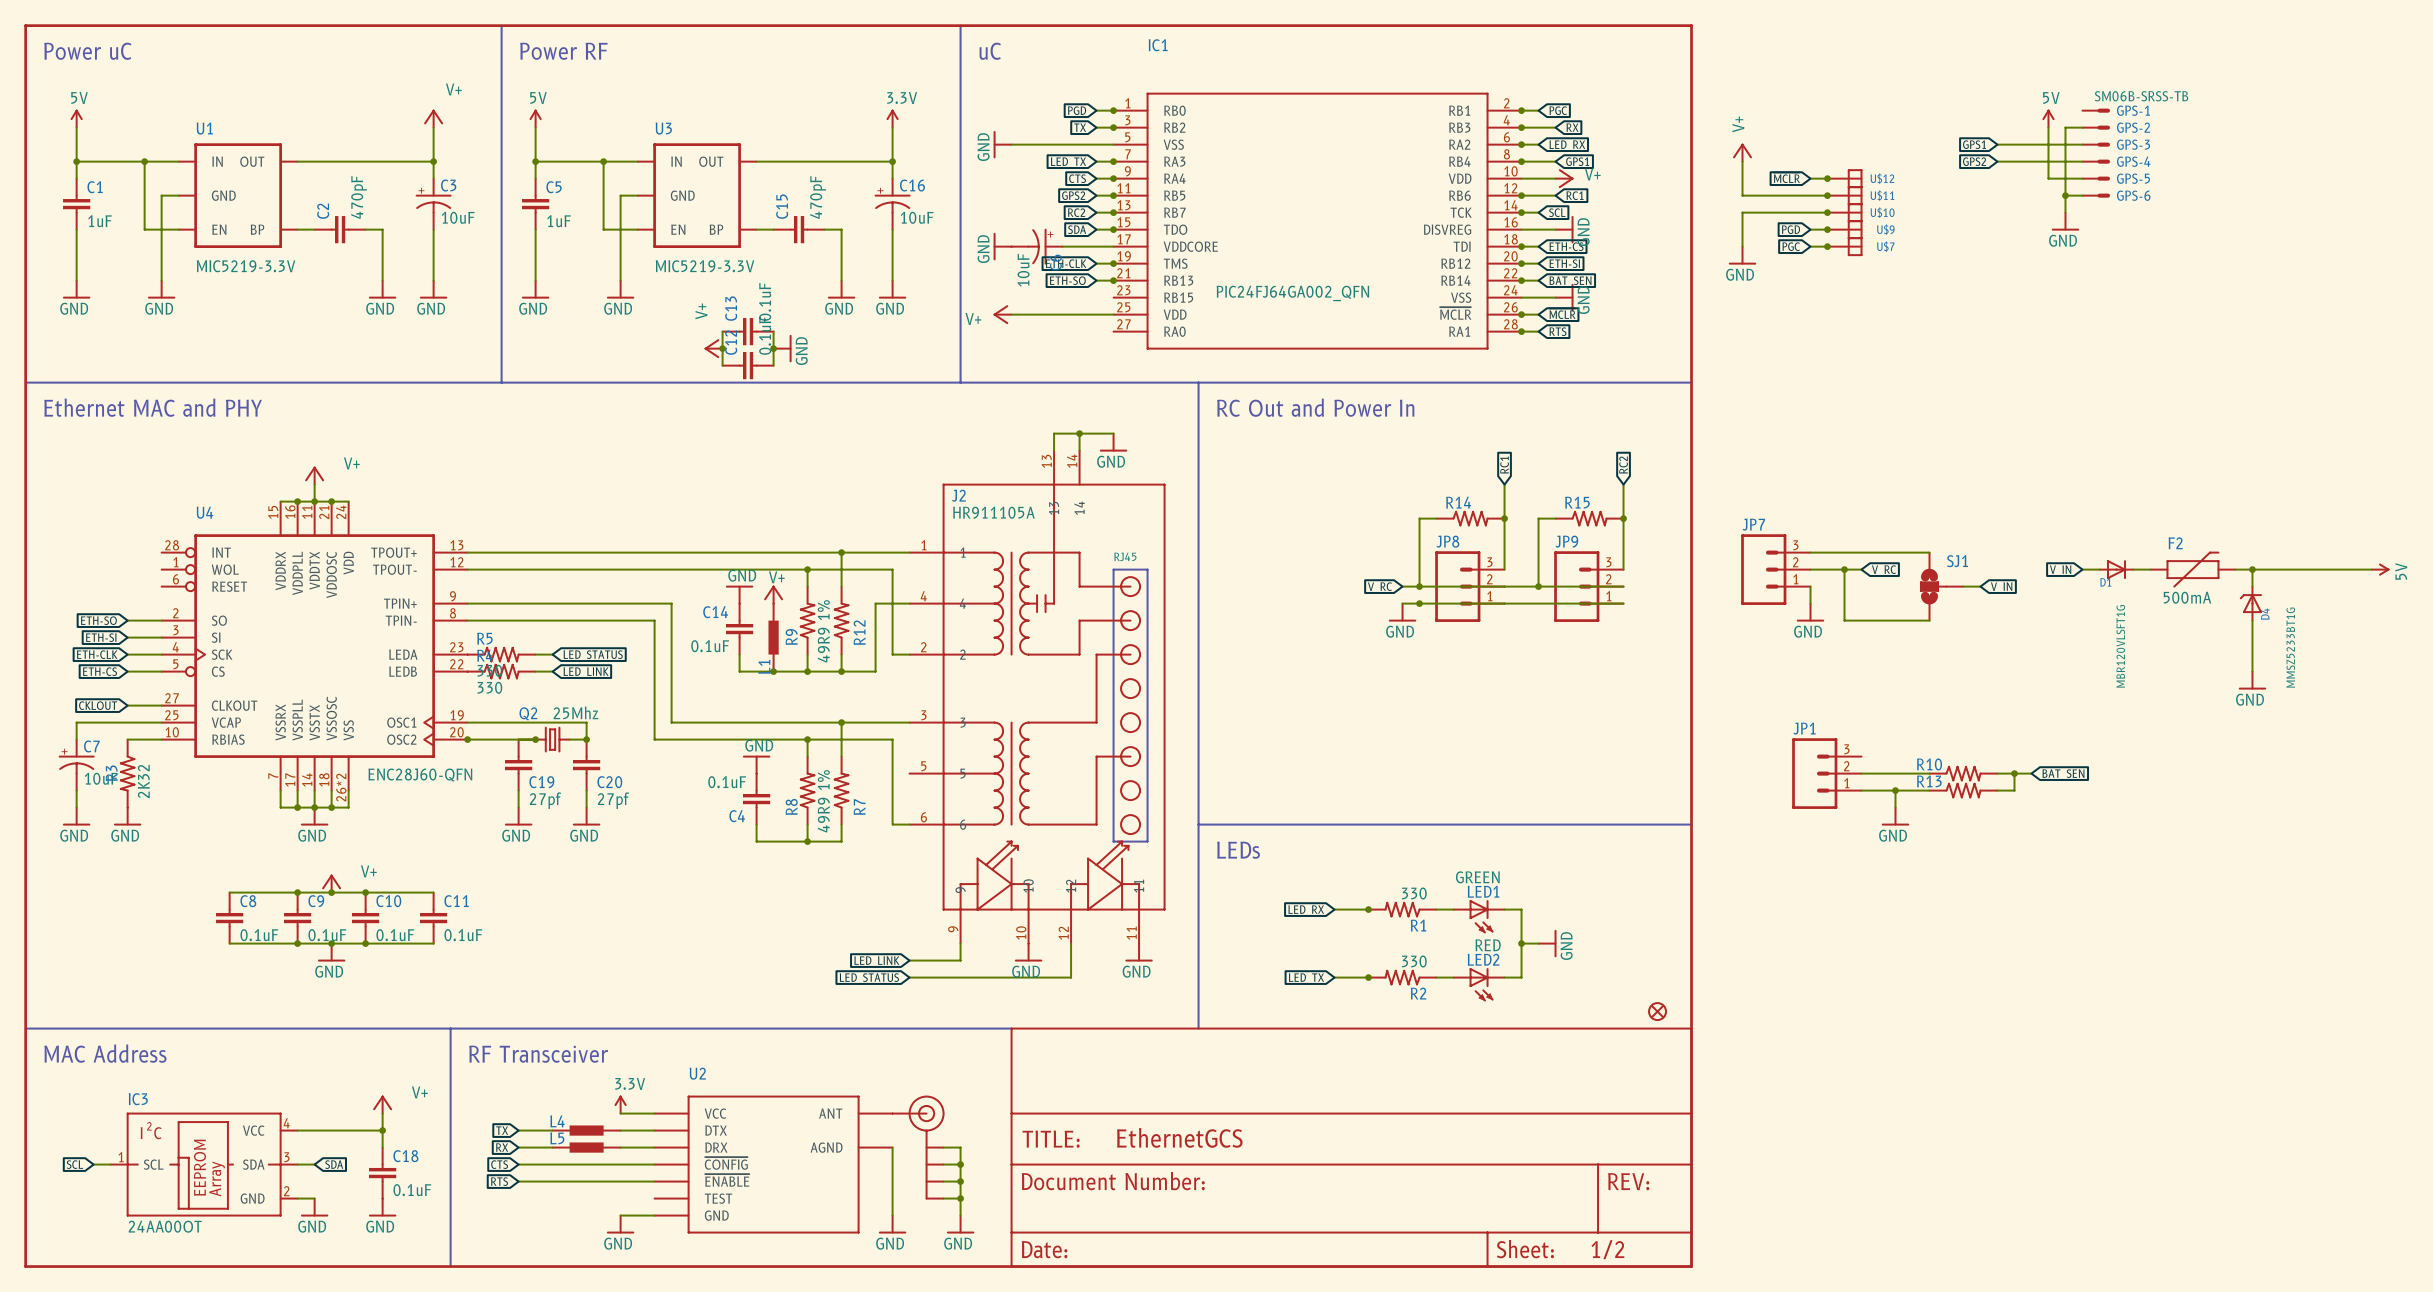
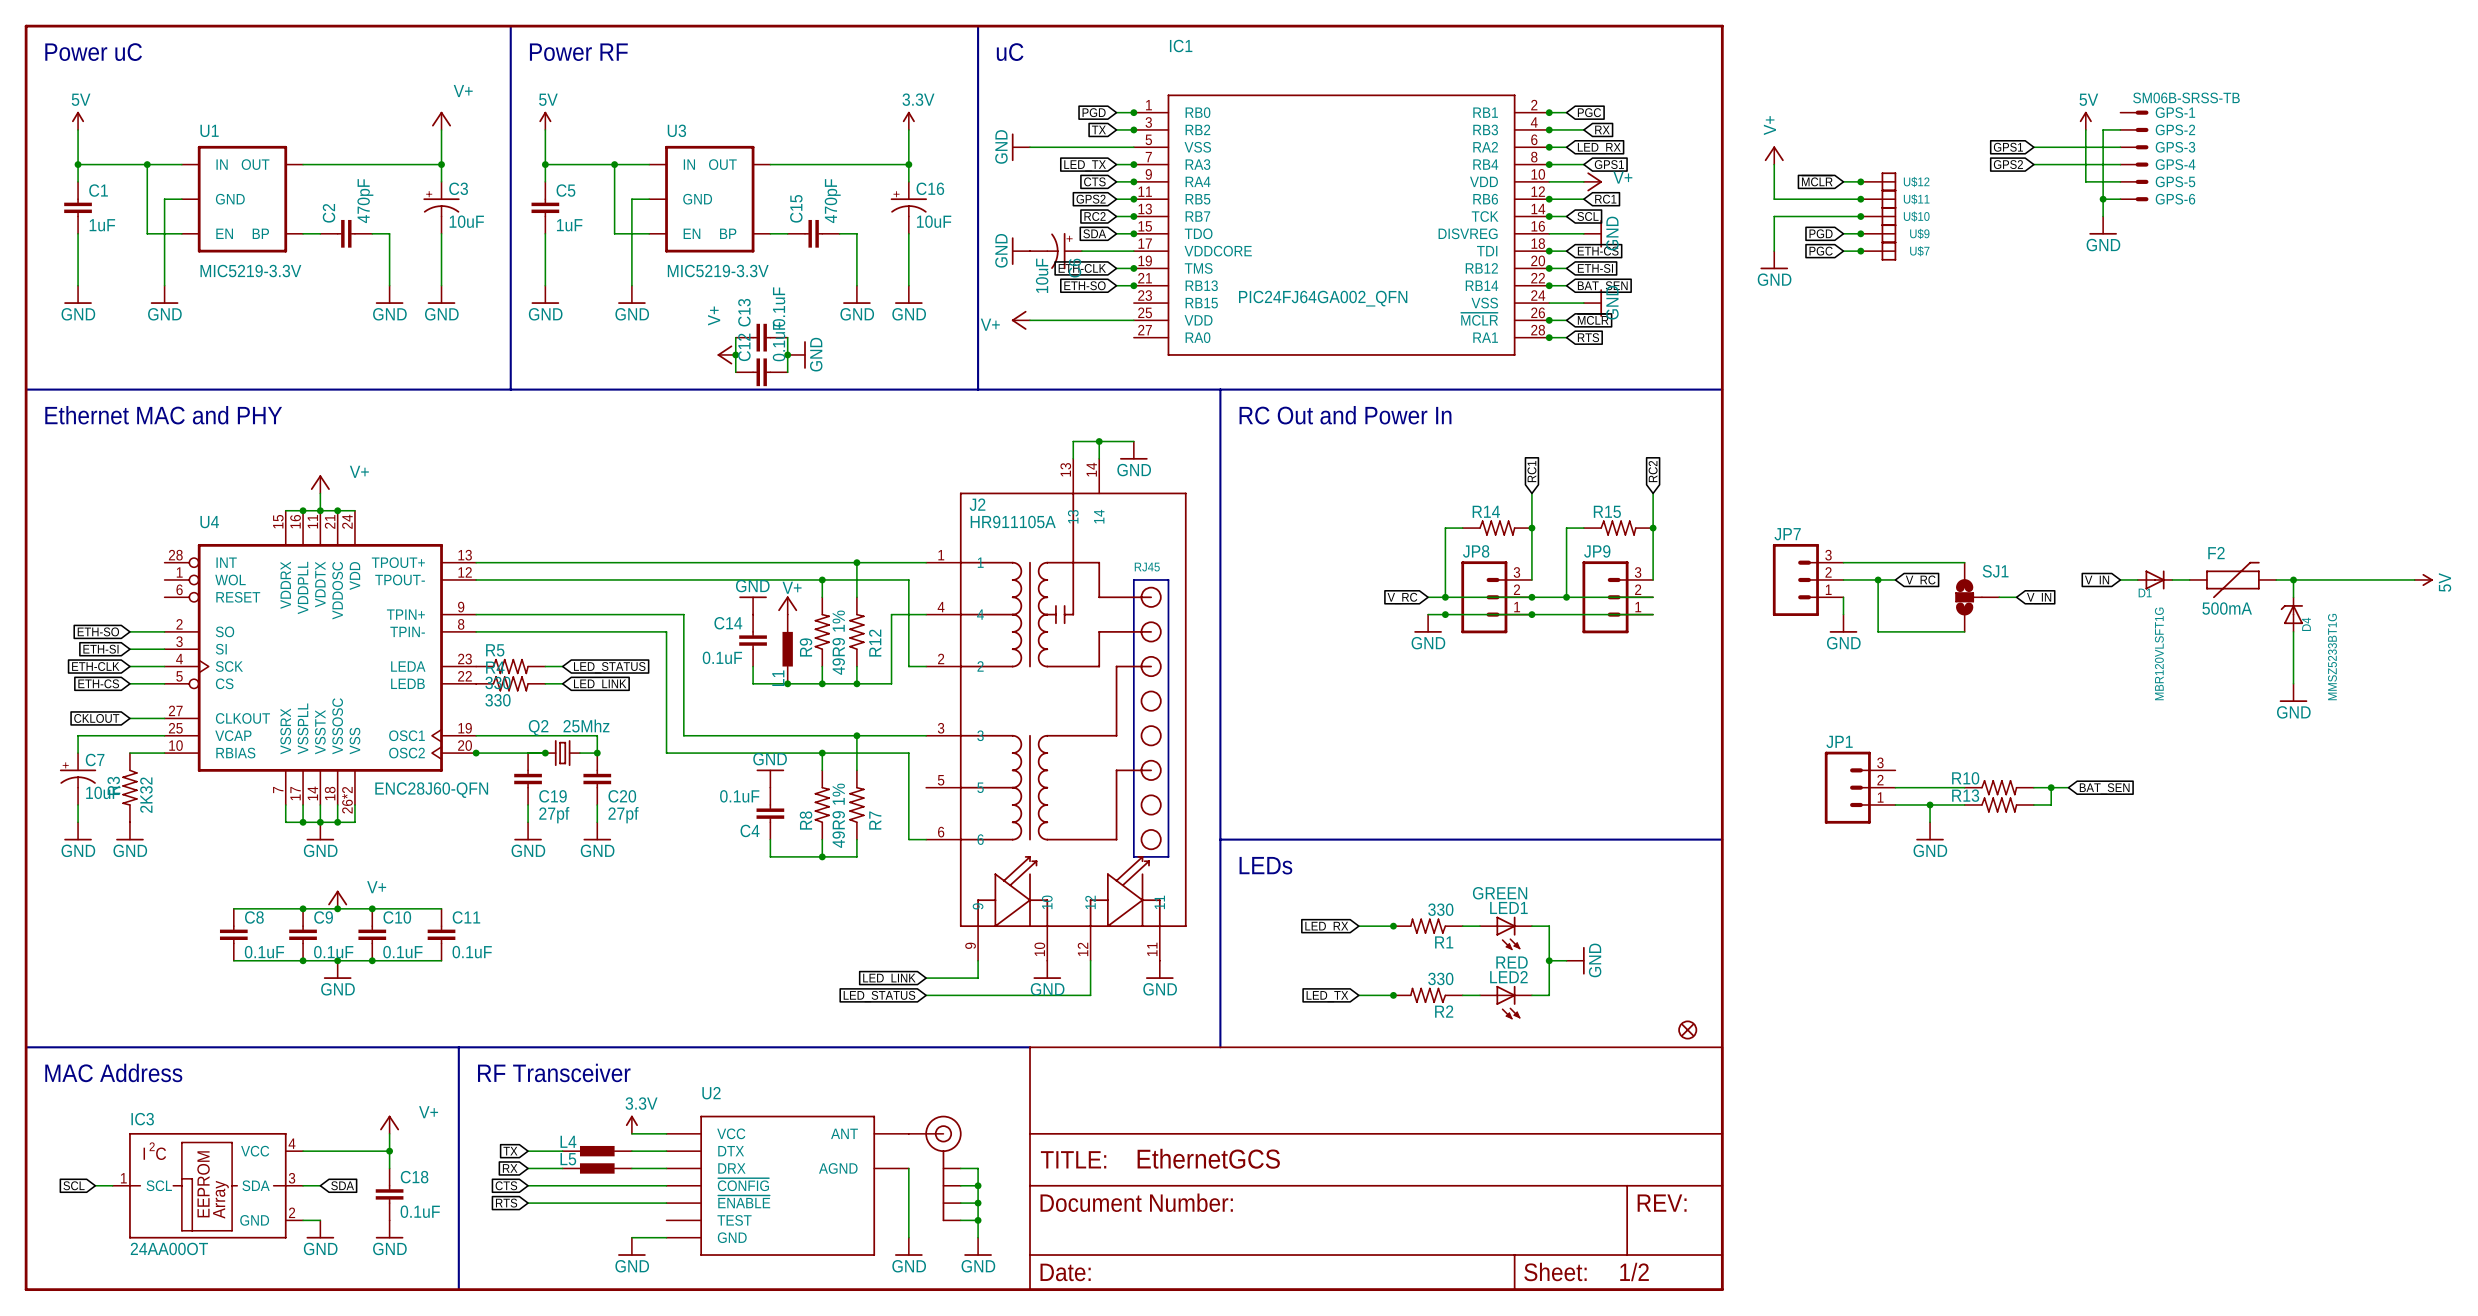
junction: none -> (1531, 597)
junction: none -> (1531, 614)

